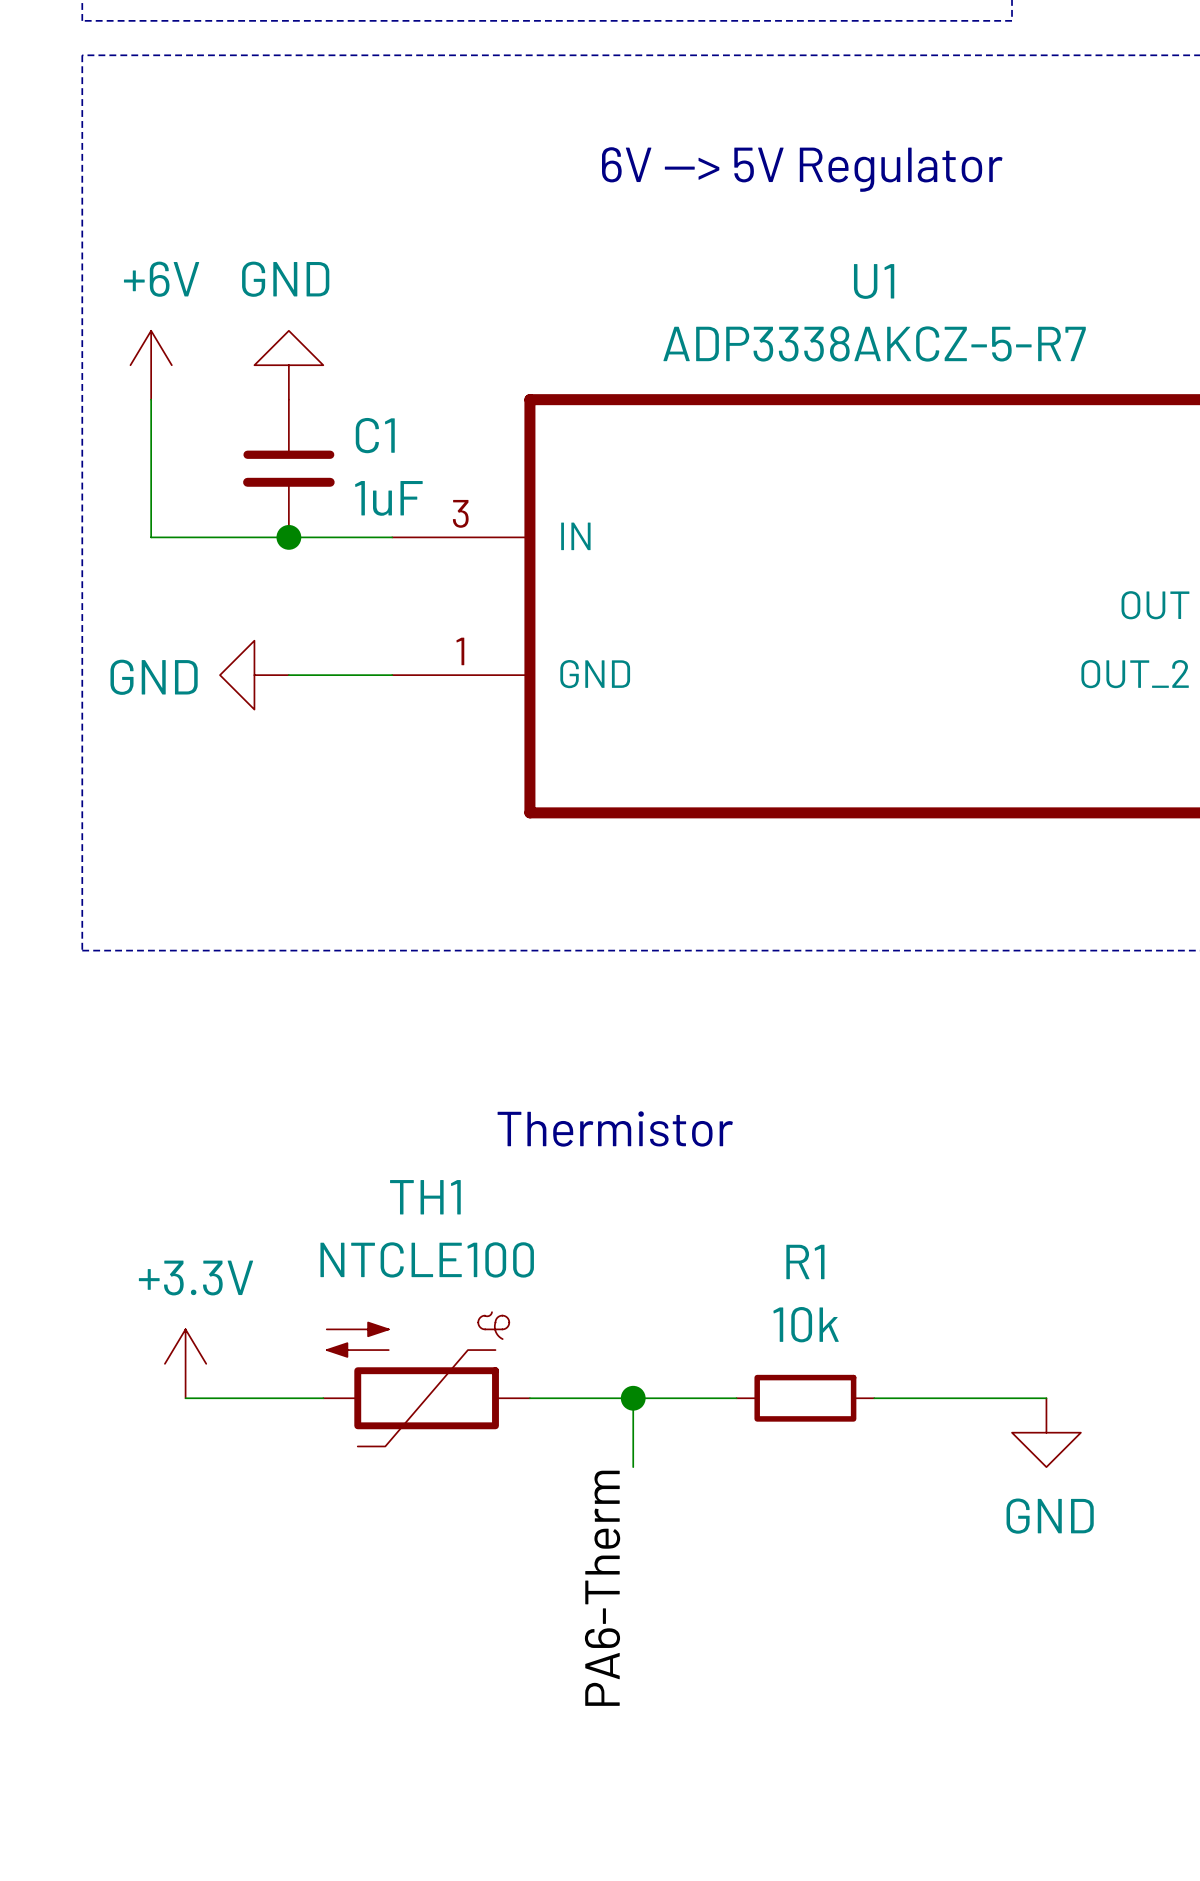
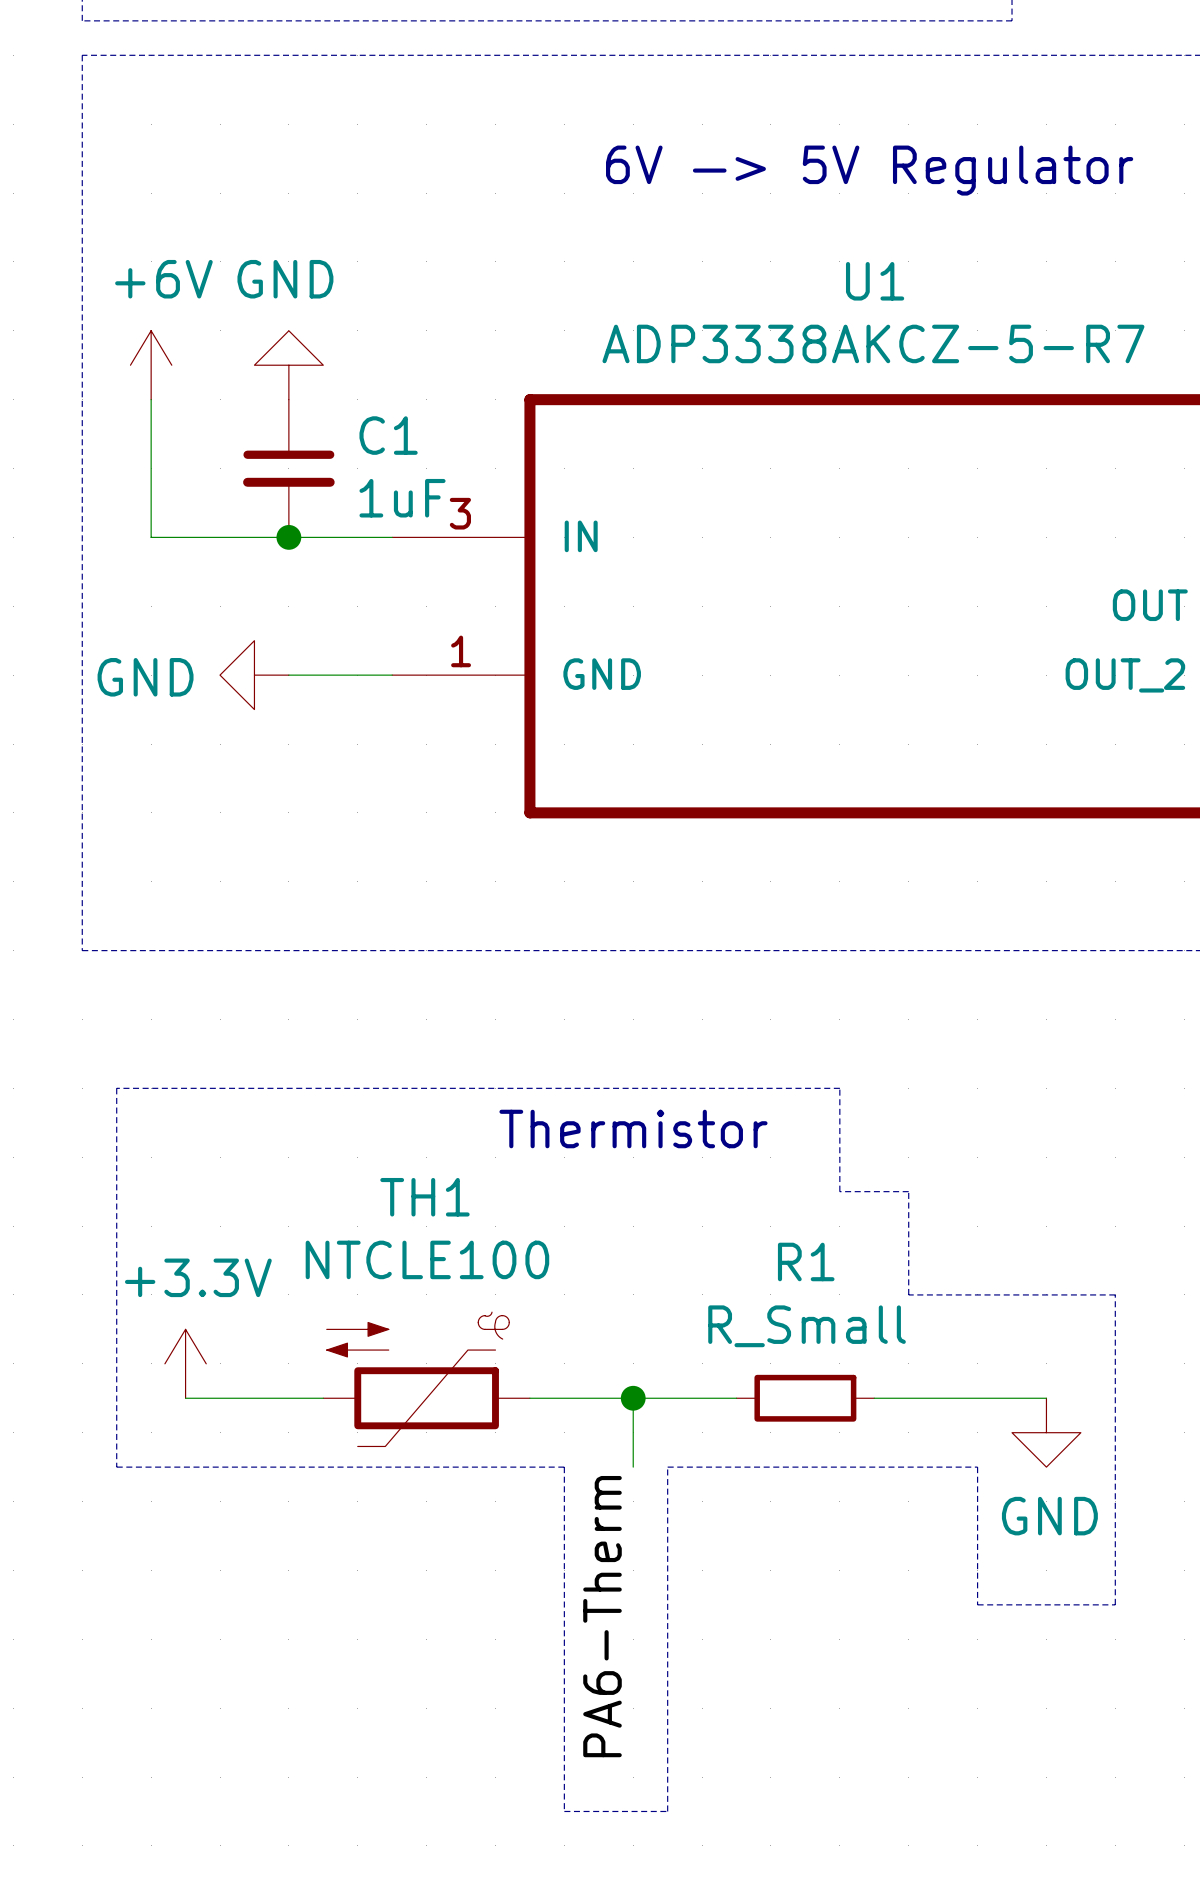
line: none -> (116, 1088) (116, 1467) (564, 1467) (564, 1811) (667, 1811) (667, 1467) (977, 1467) (977, 1604) (1115, 1604) (1115, 1294) (908, 1294) (908, 1191) (839, 1191) (839, 1088) (116, 1088)
R1 value: 10k (806, 1324) -> R_Small (807, 1326)

